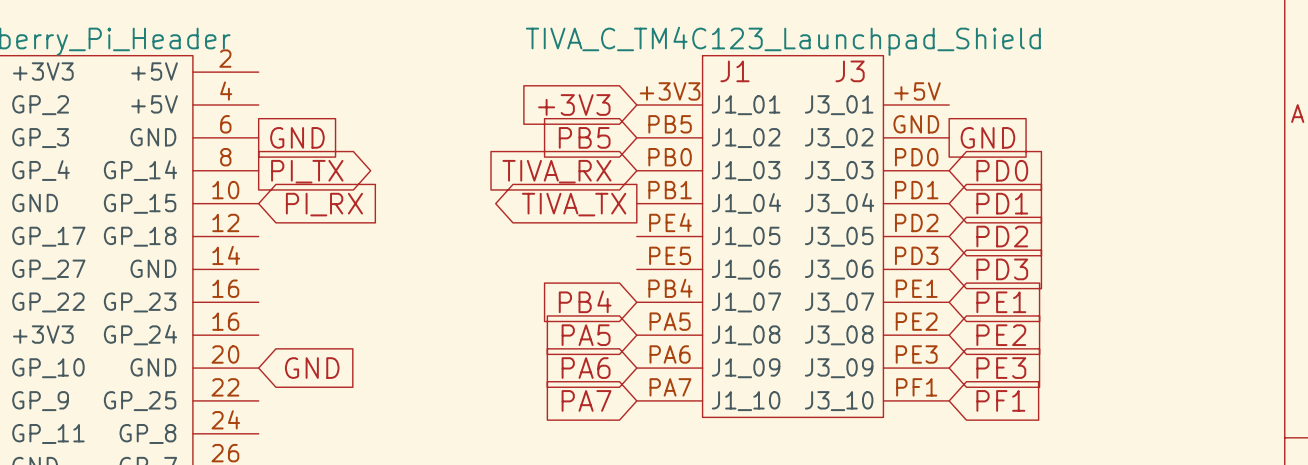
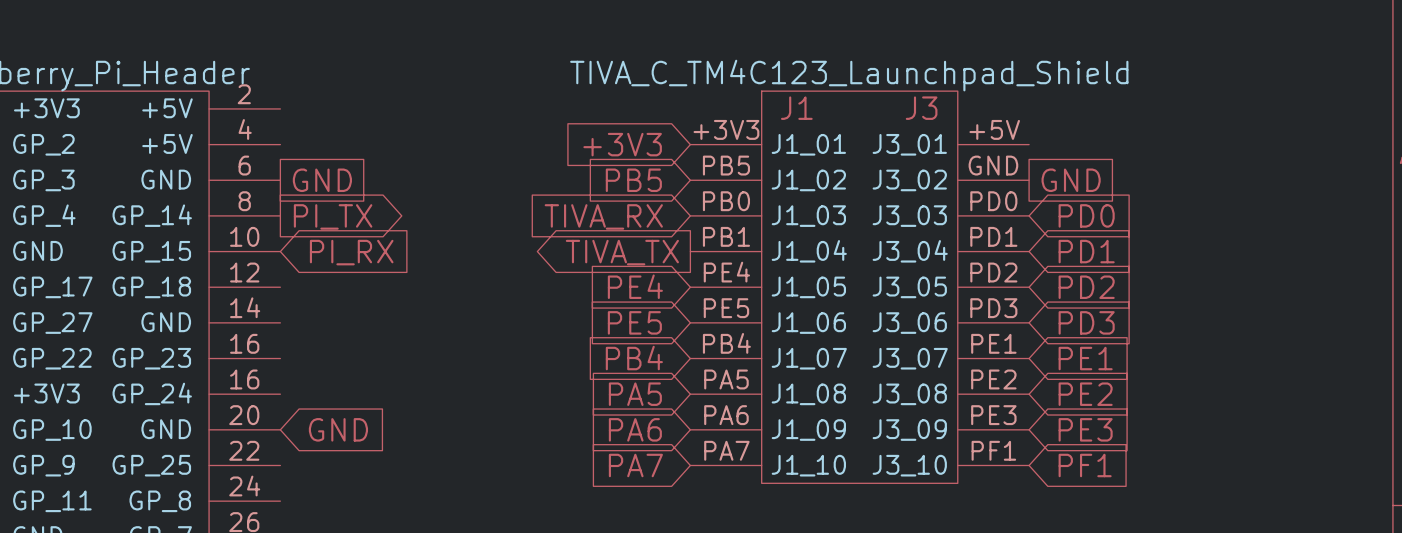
global label: none -> PE4 (635, 286)
global label: none -> PE5 (634, 322)

